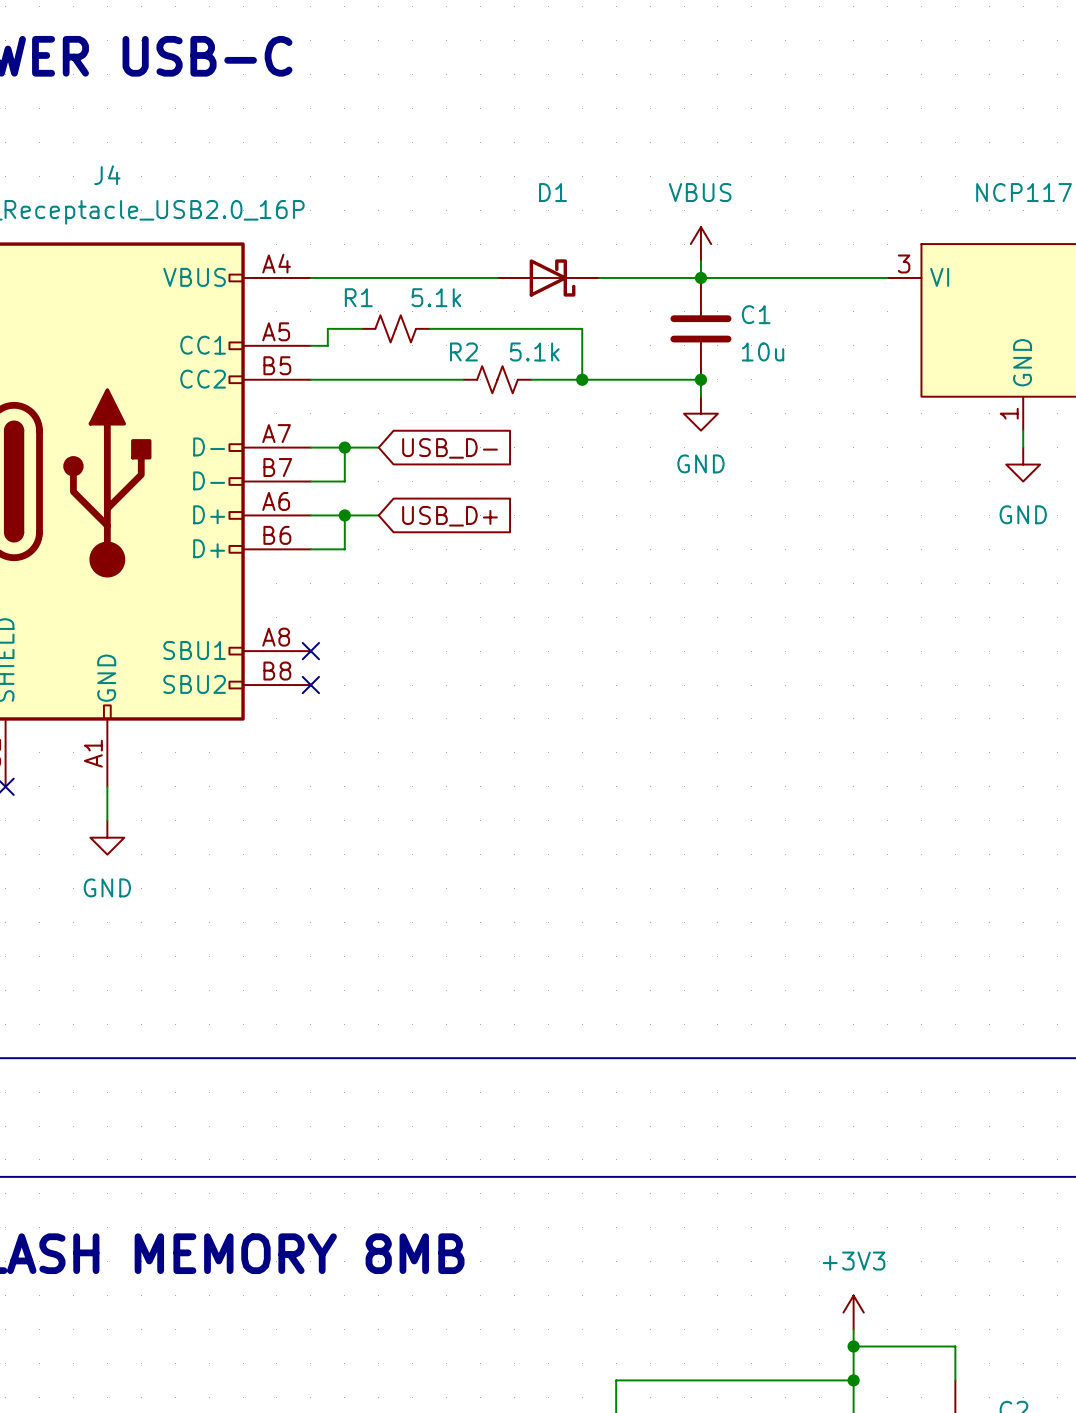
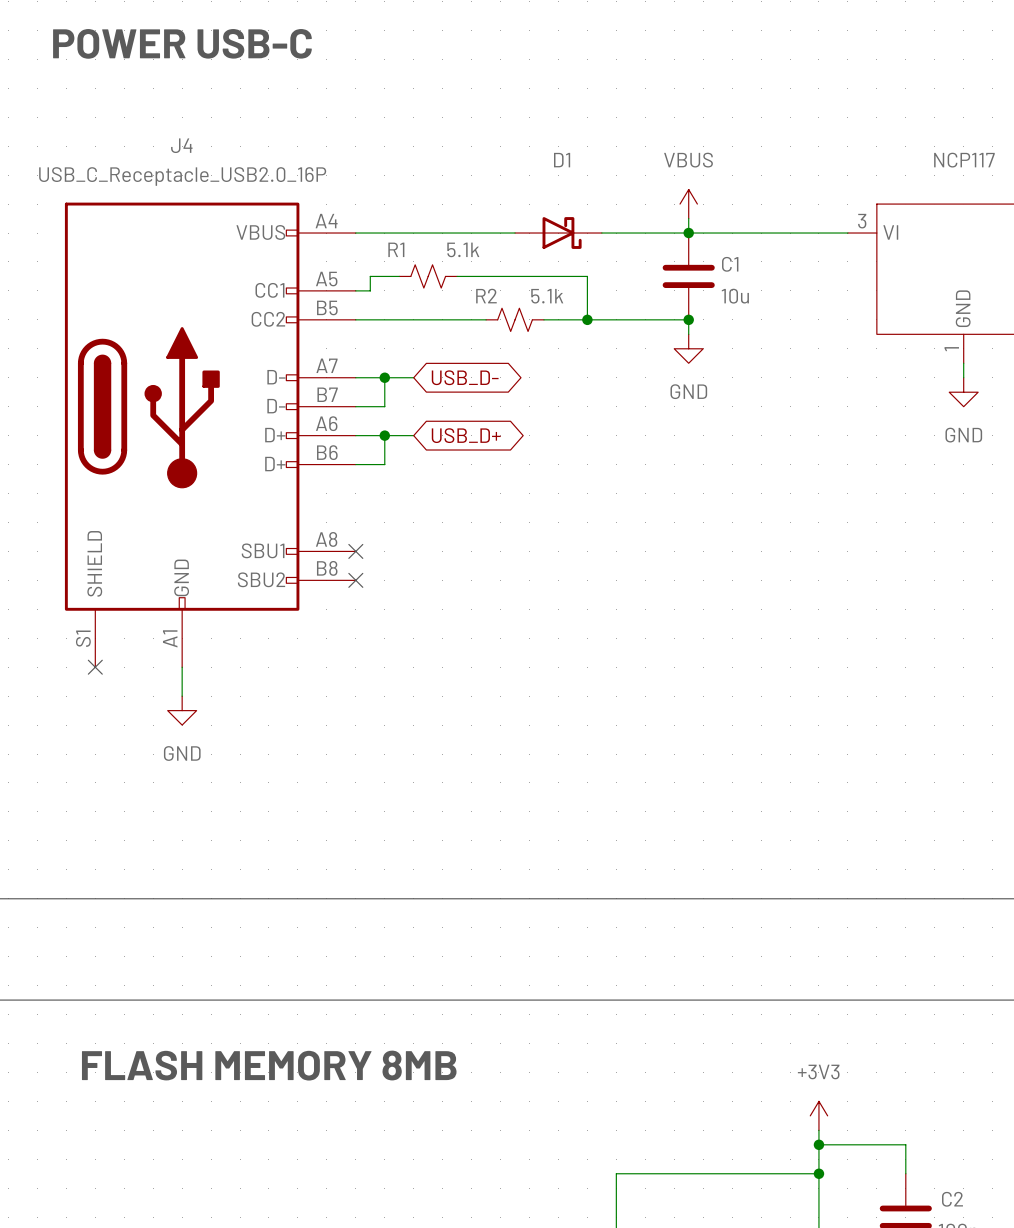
global label shape: input (450, 448) -> bidirectional (465, 377)
global label shape: input (450, 516) -> bidirectional (466, 435)

